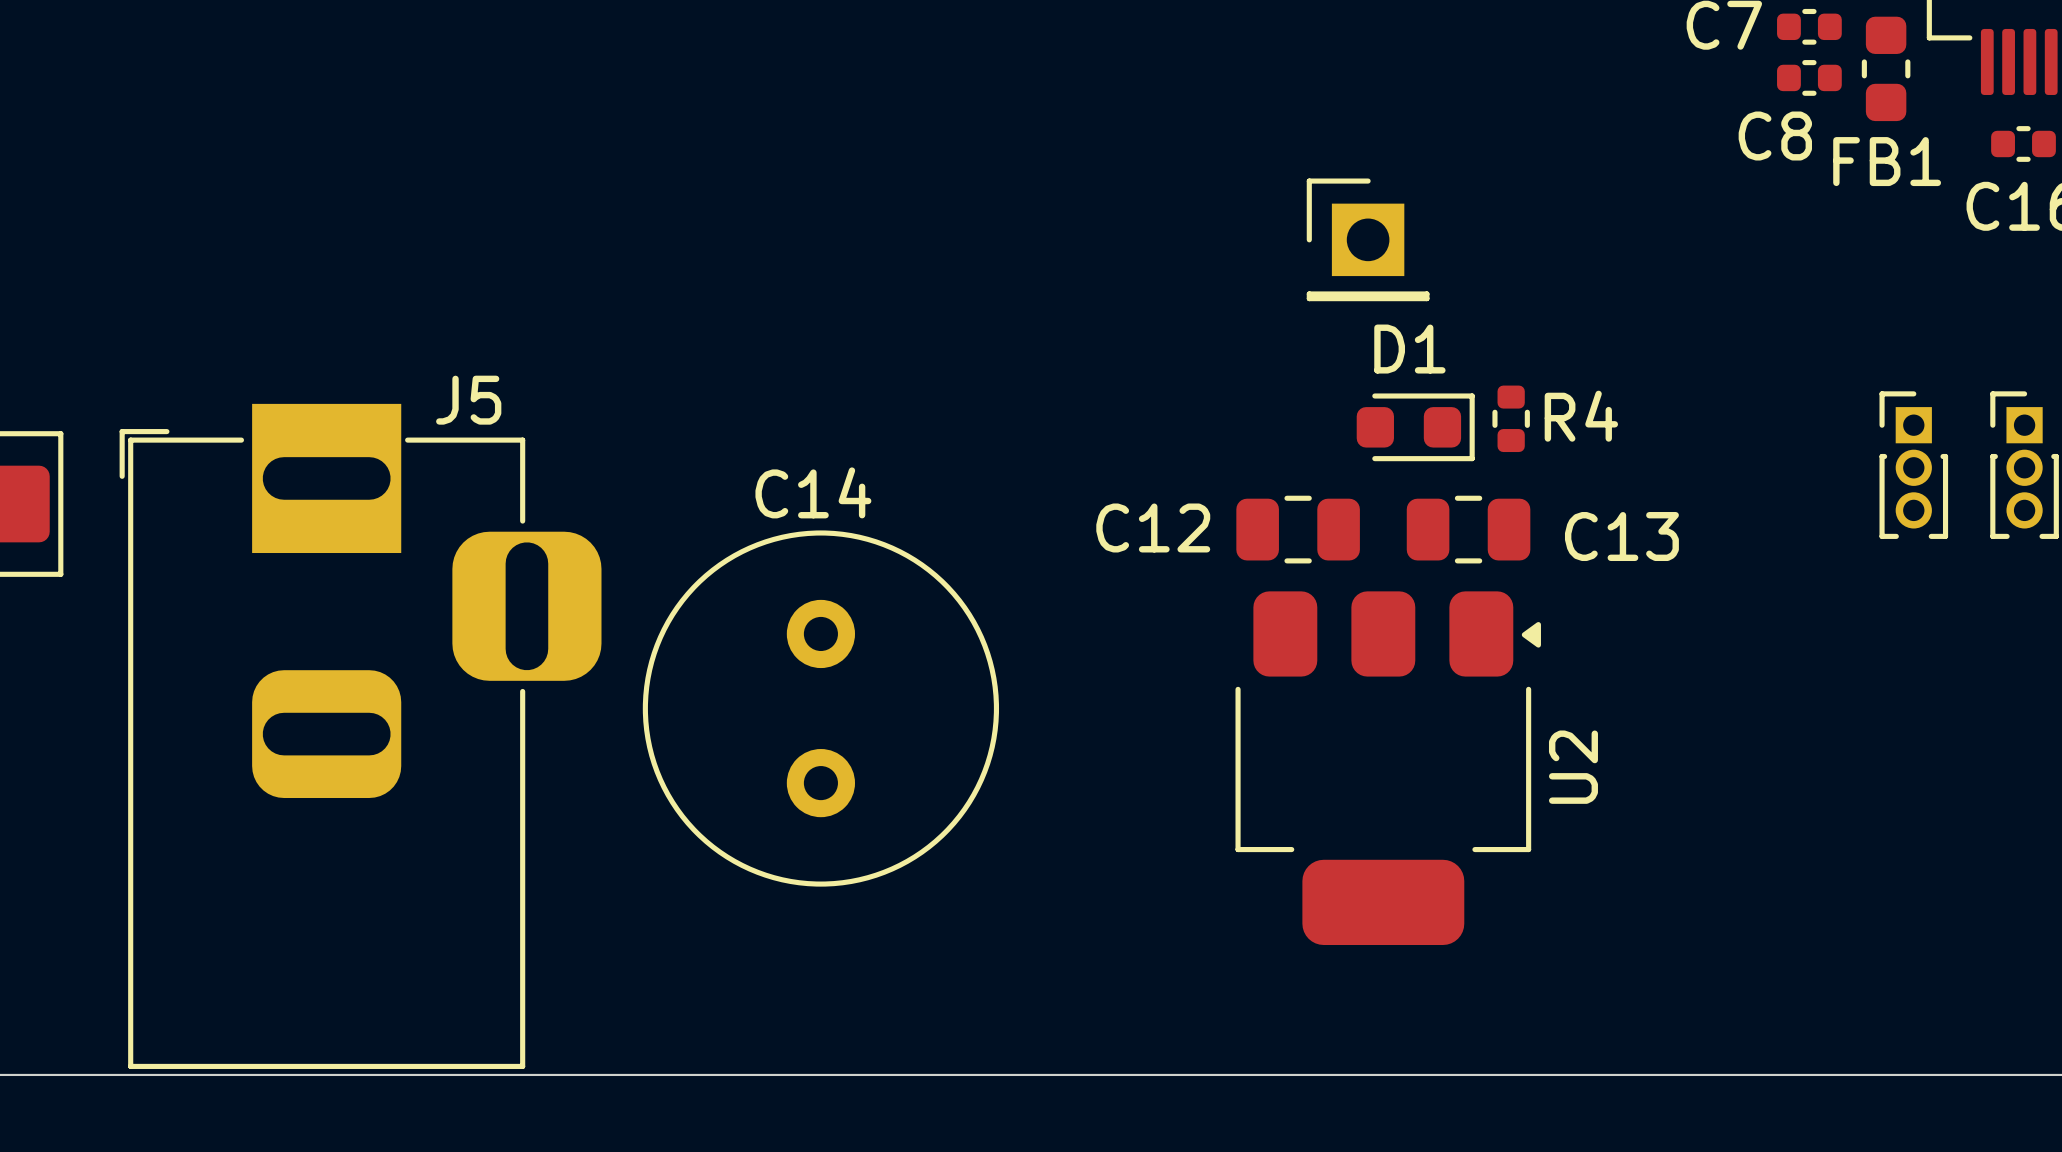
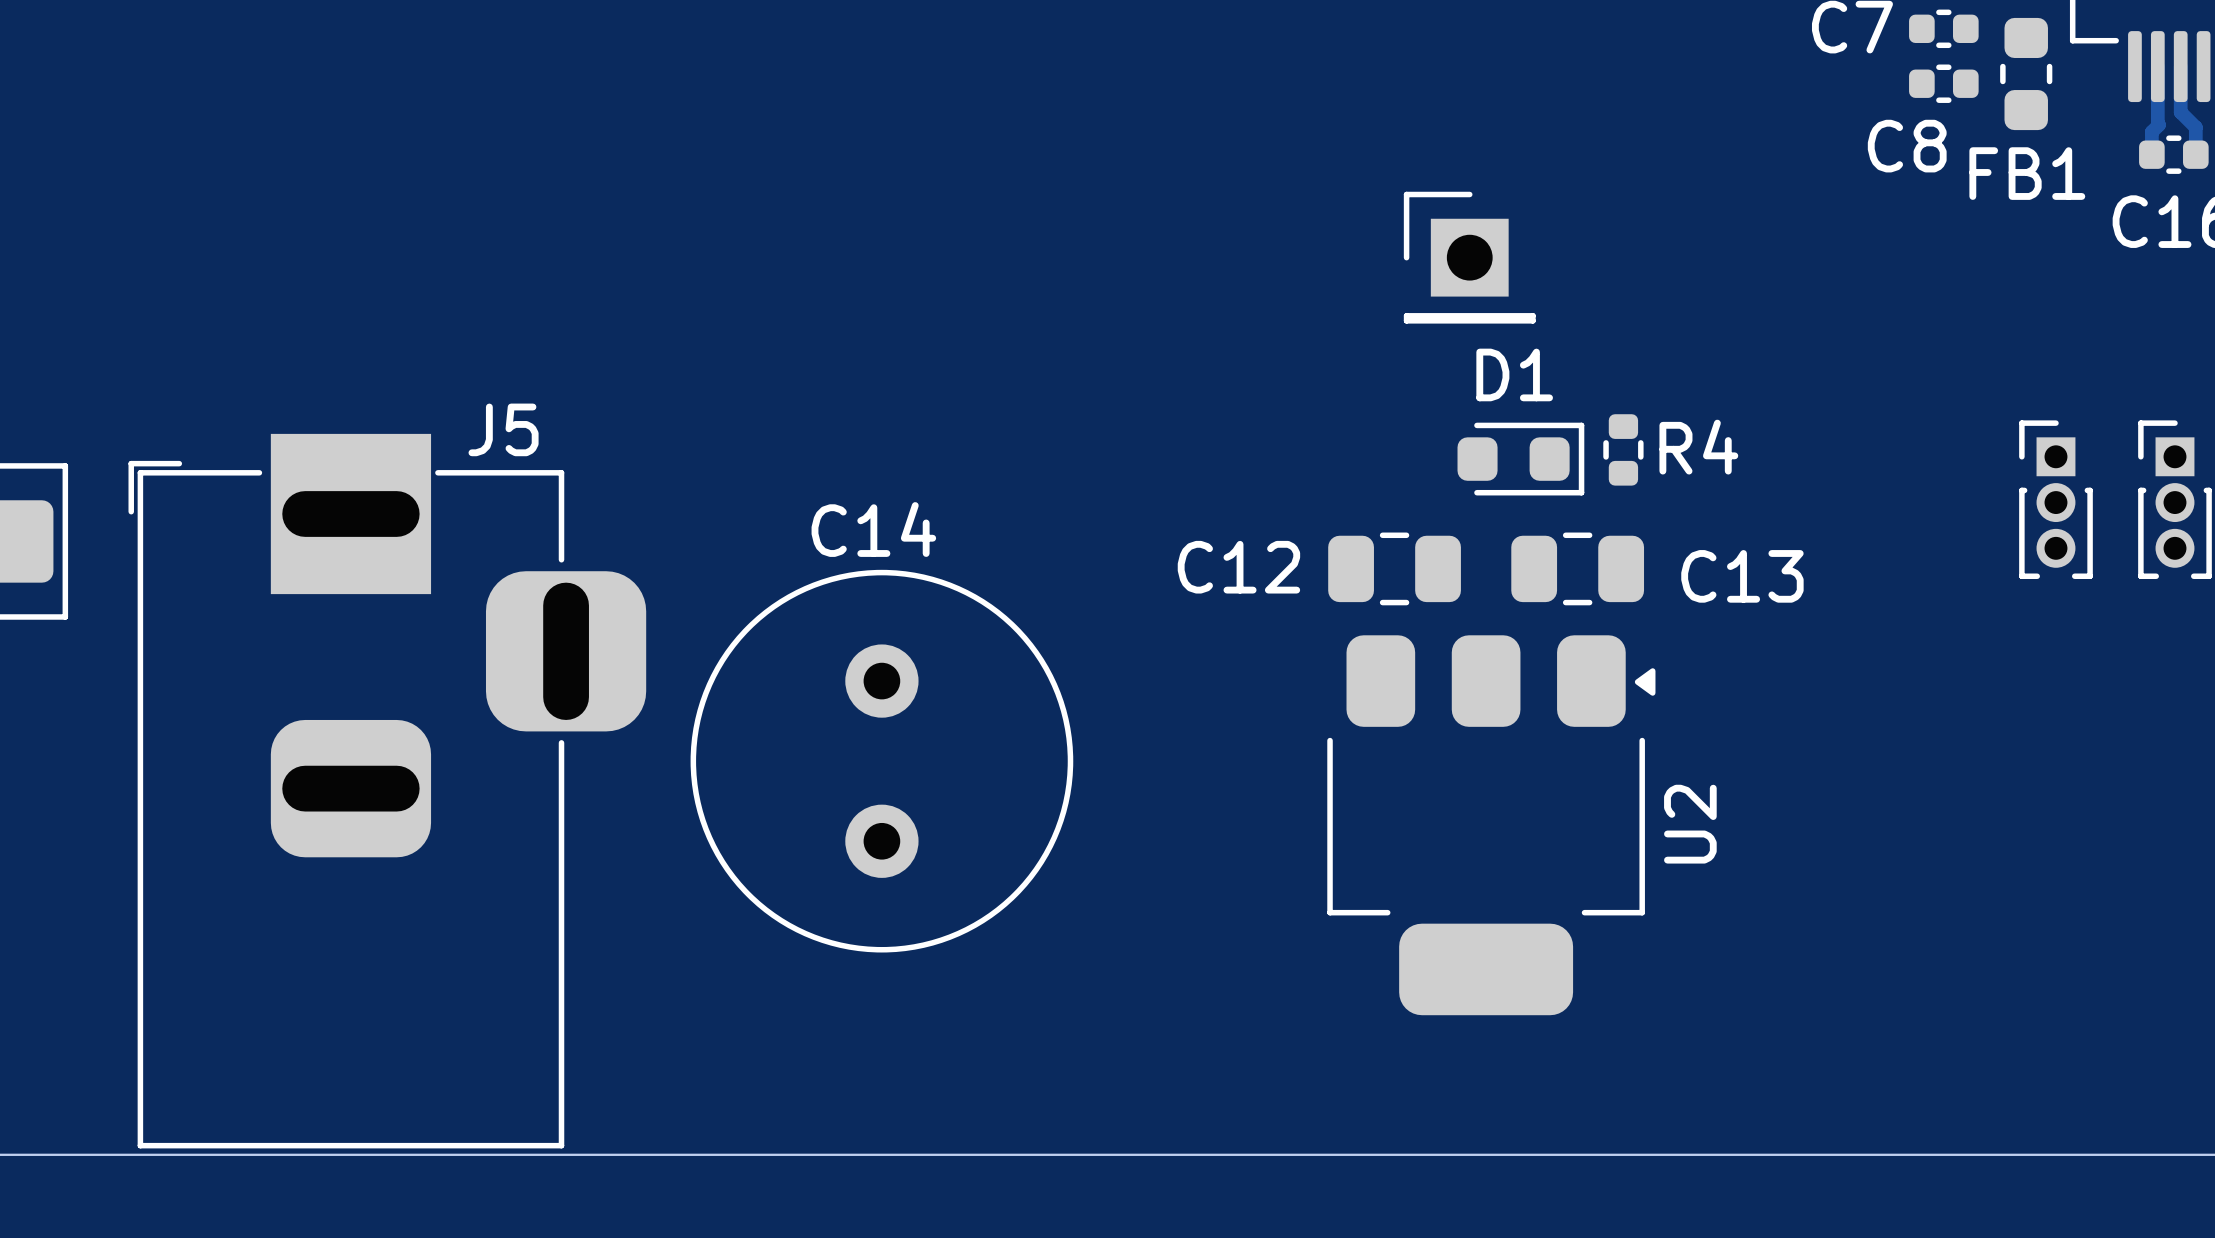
track: none -> (2157, 66) (2158, 124) (2151, 132) (2151, 154)
track: none -> (2180, 66) (2180, 112) (2195, 127) (2195, 154)

